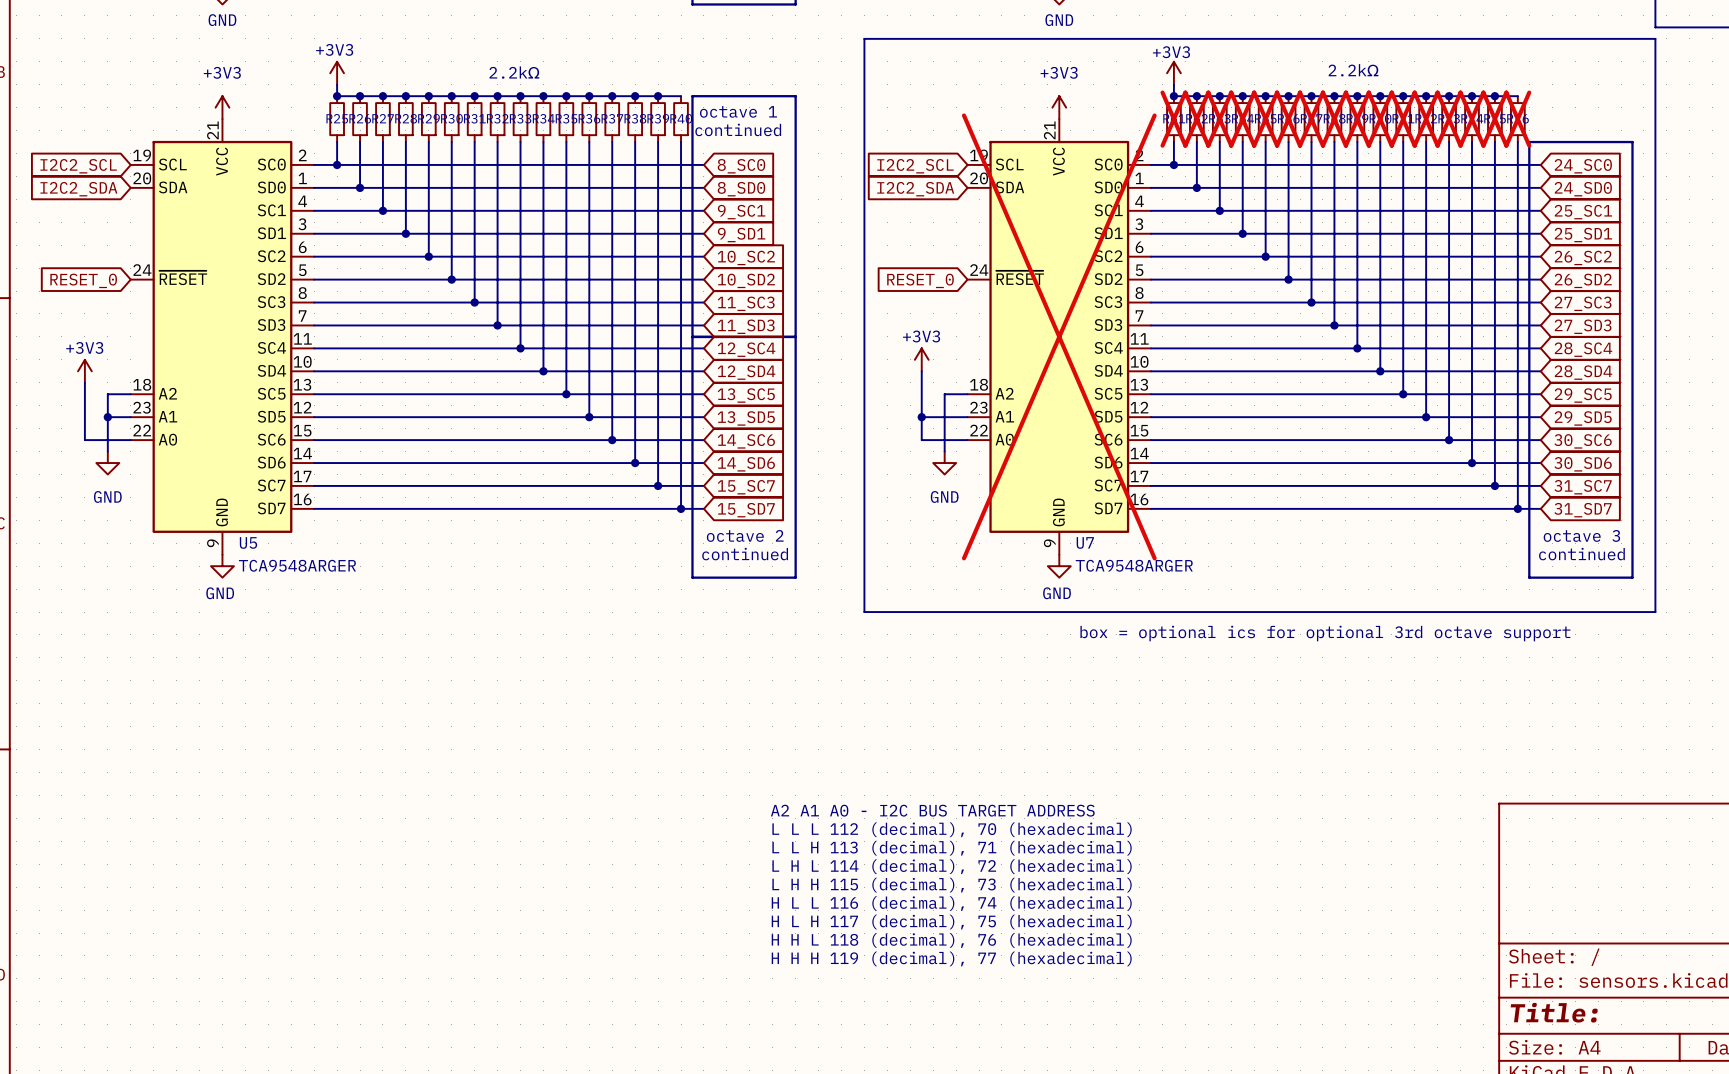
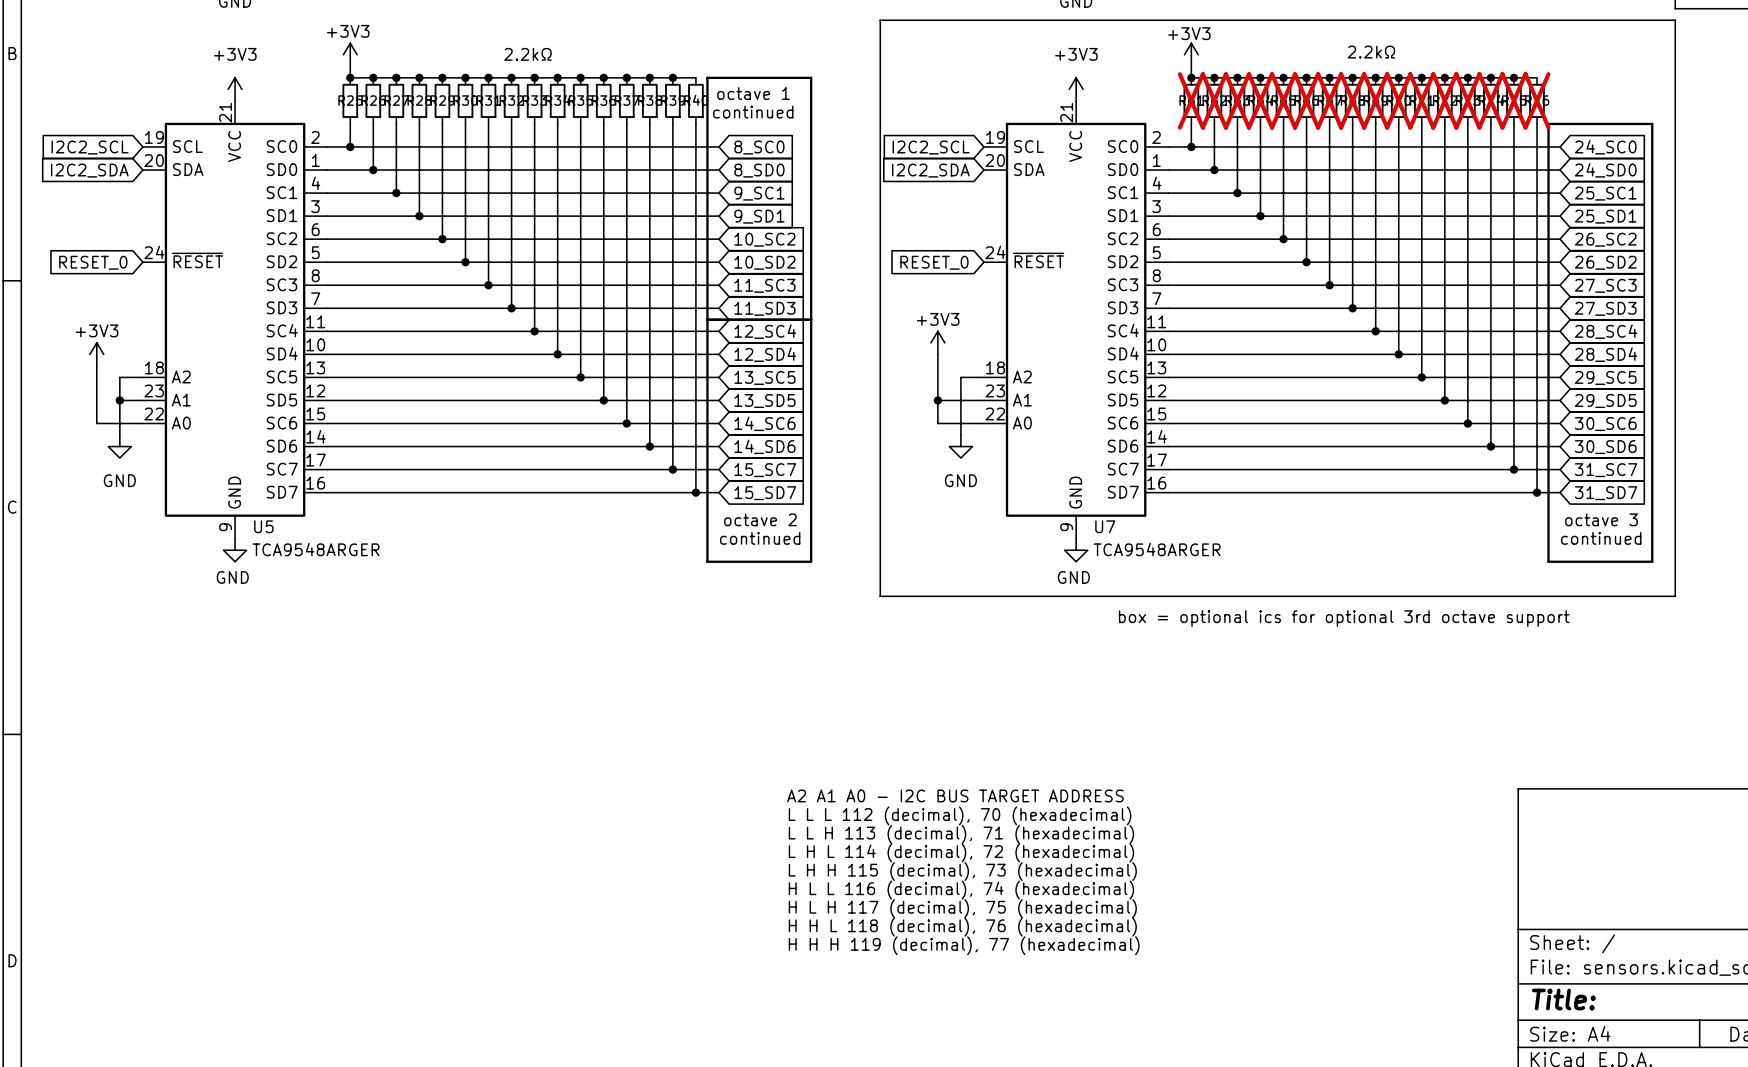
U7 do-not-place cross: (1059, 336) -> none

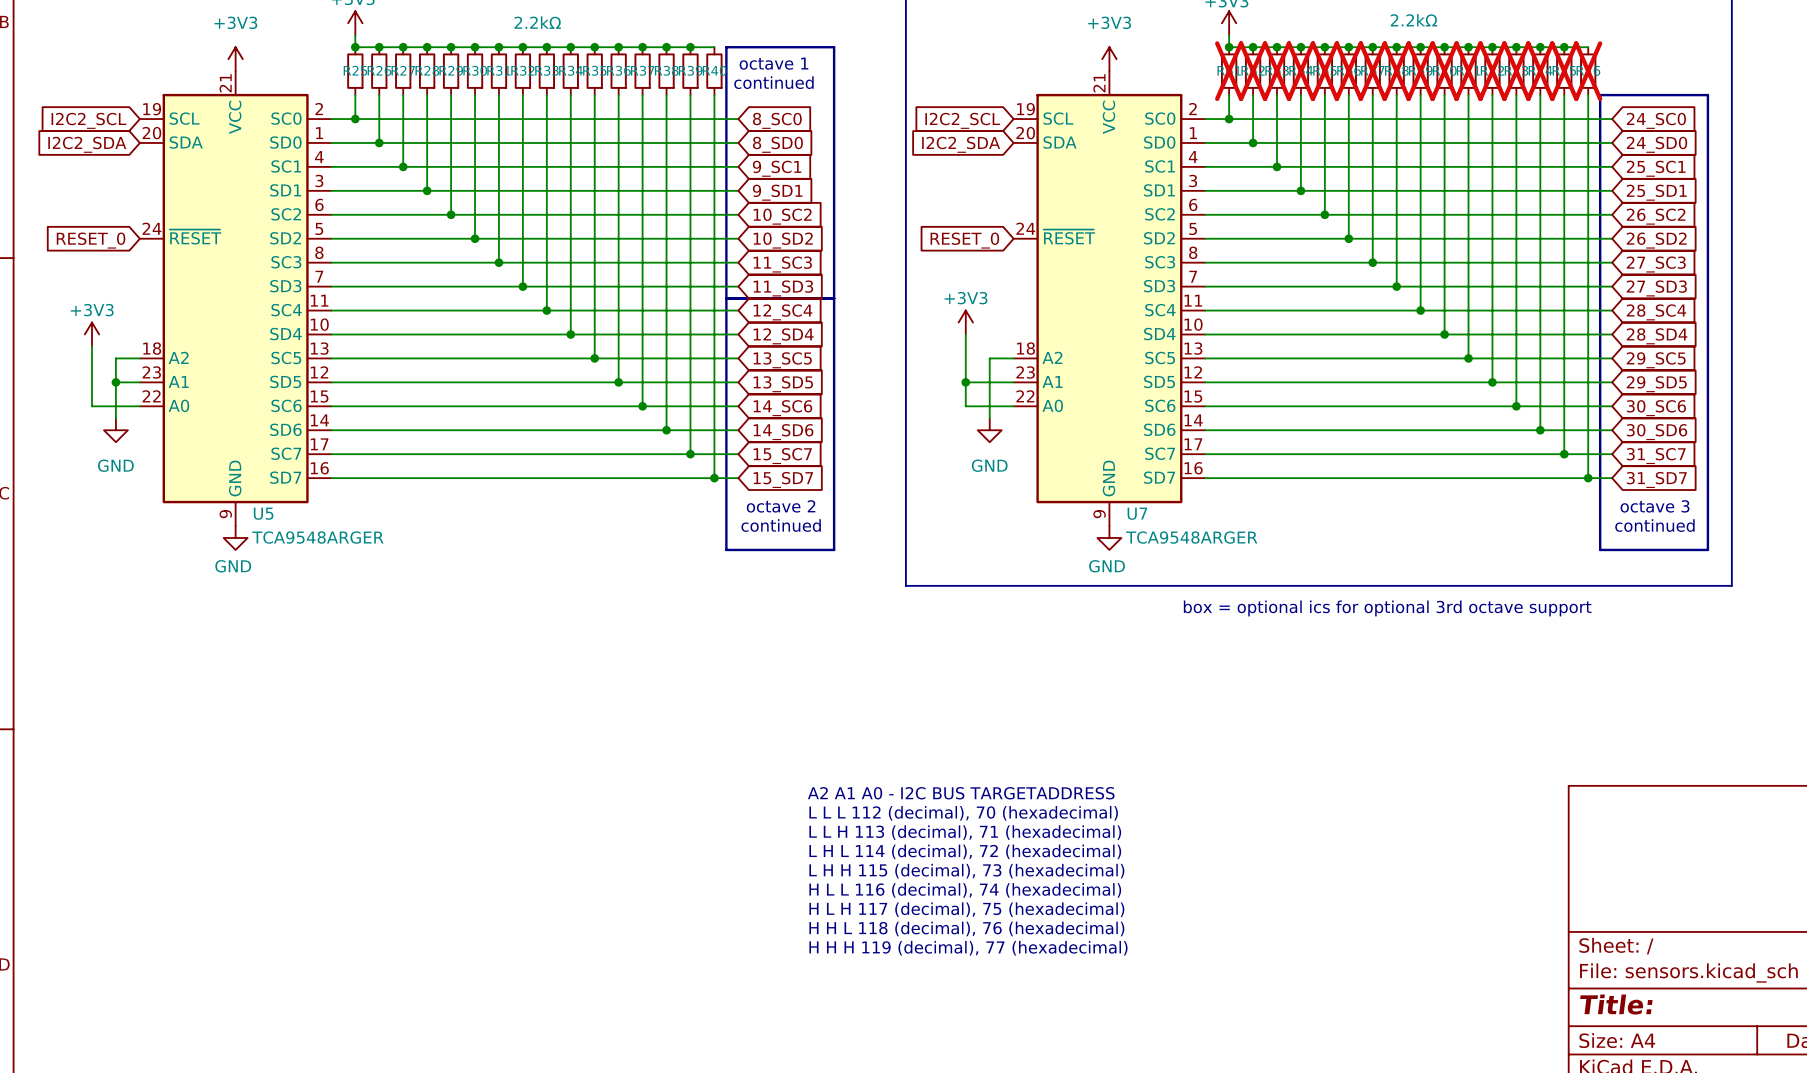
text: A2 A1 A0 - I2C BUS TARGET ADDRESS (955, 795) -> A2 A1 A0 - I2C BUS TARGETADDRESS (961, 793)

